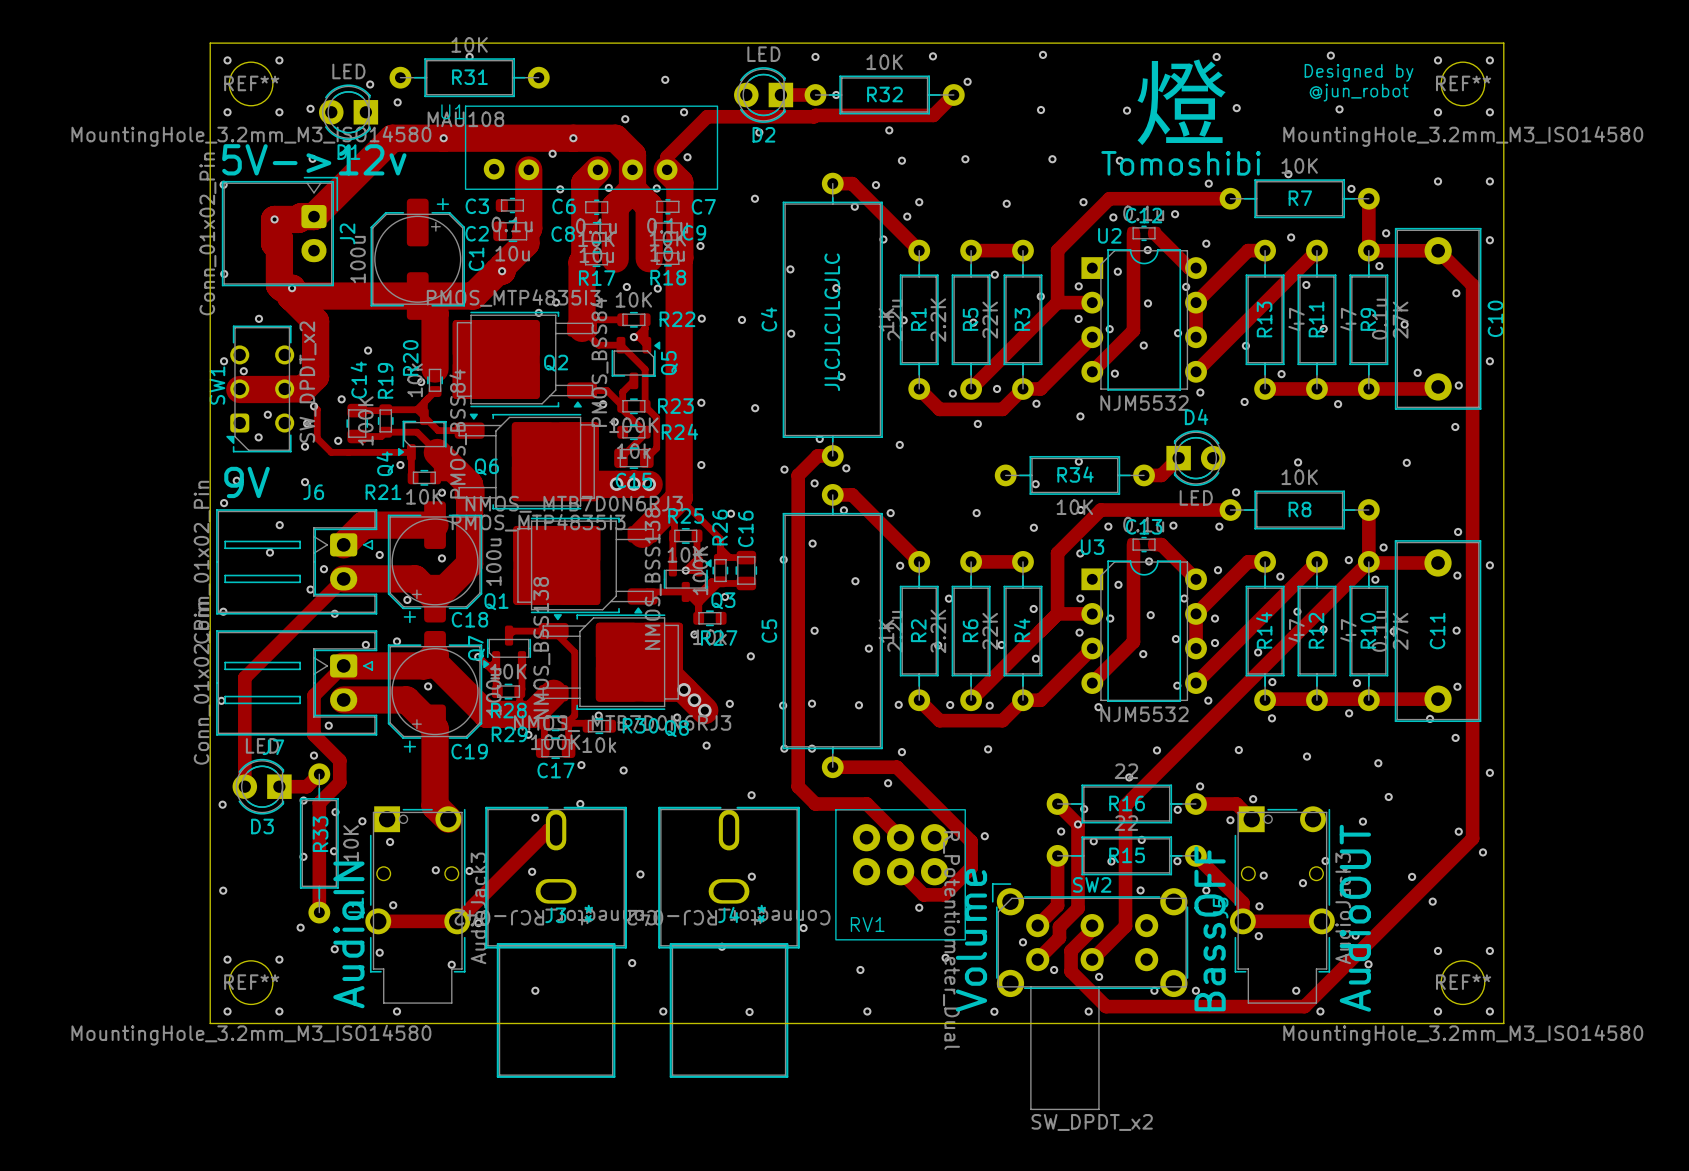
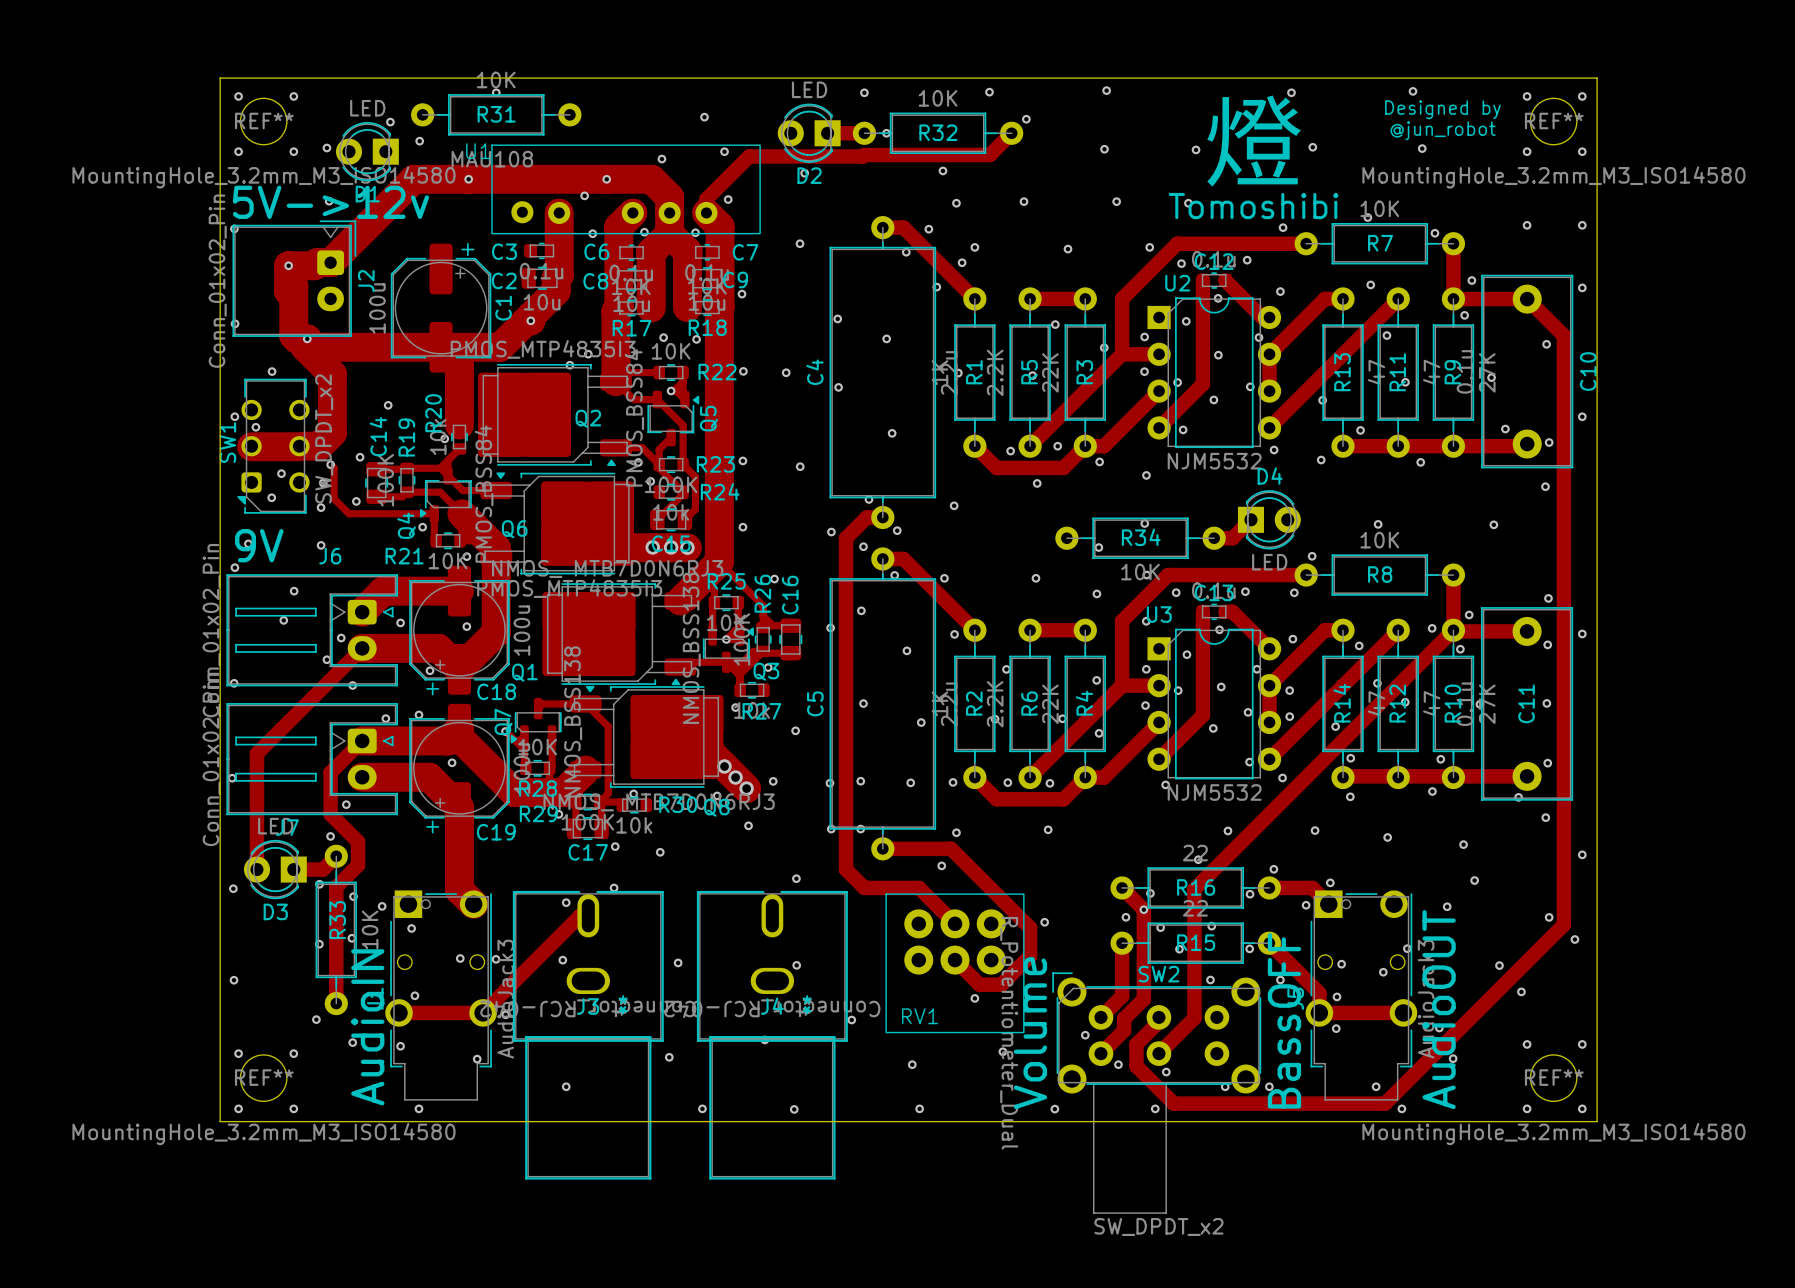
text: JLCJLCJLCJLC (832, 322) -> none

